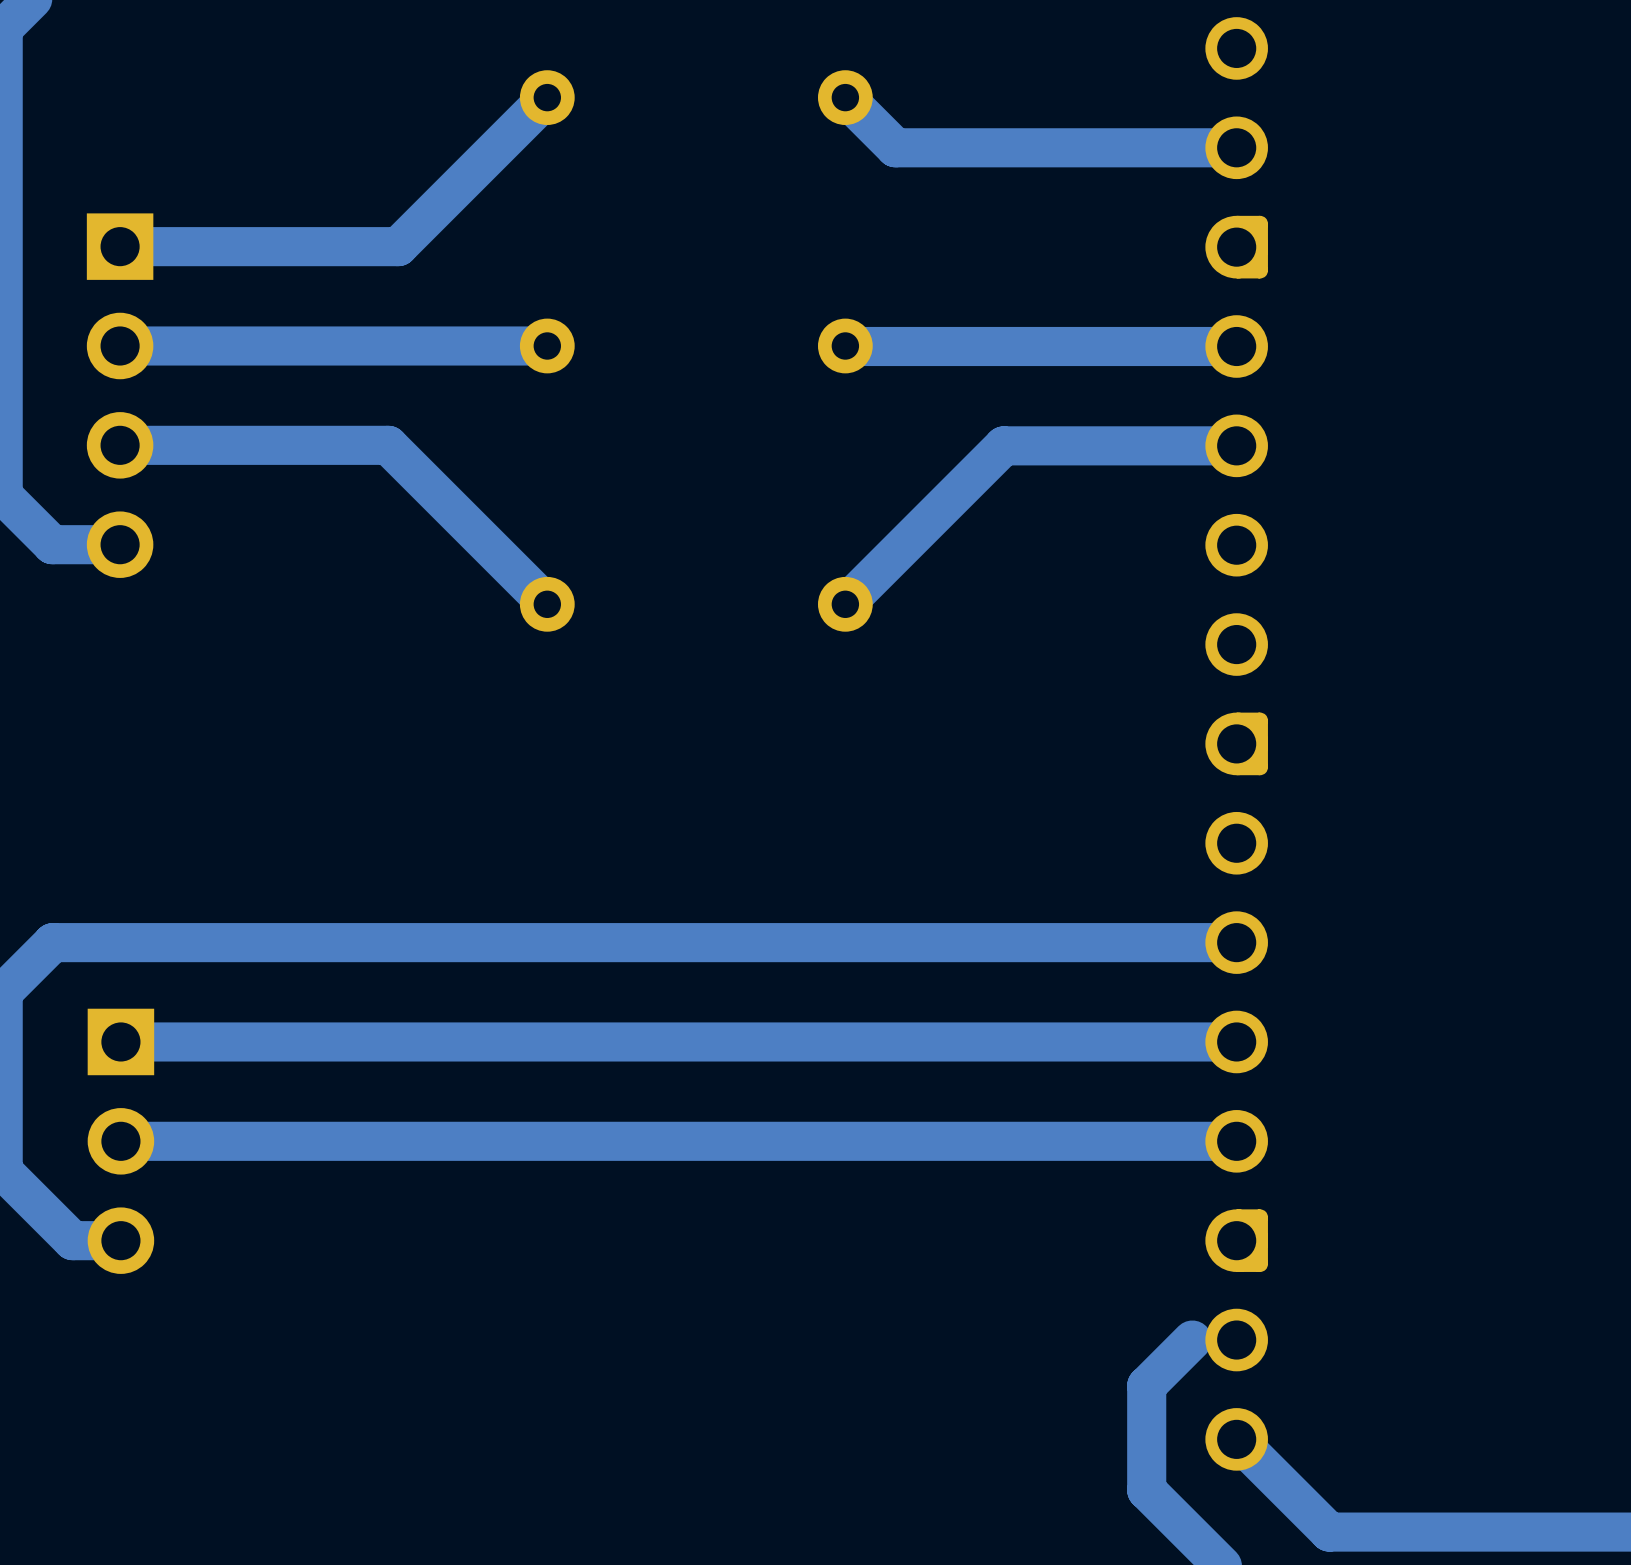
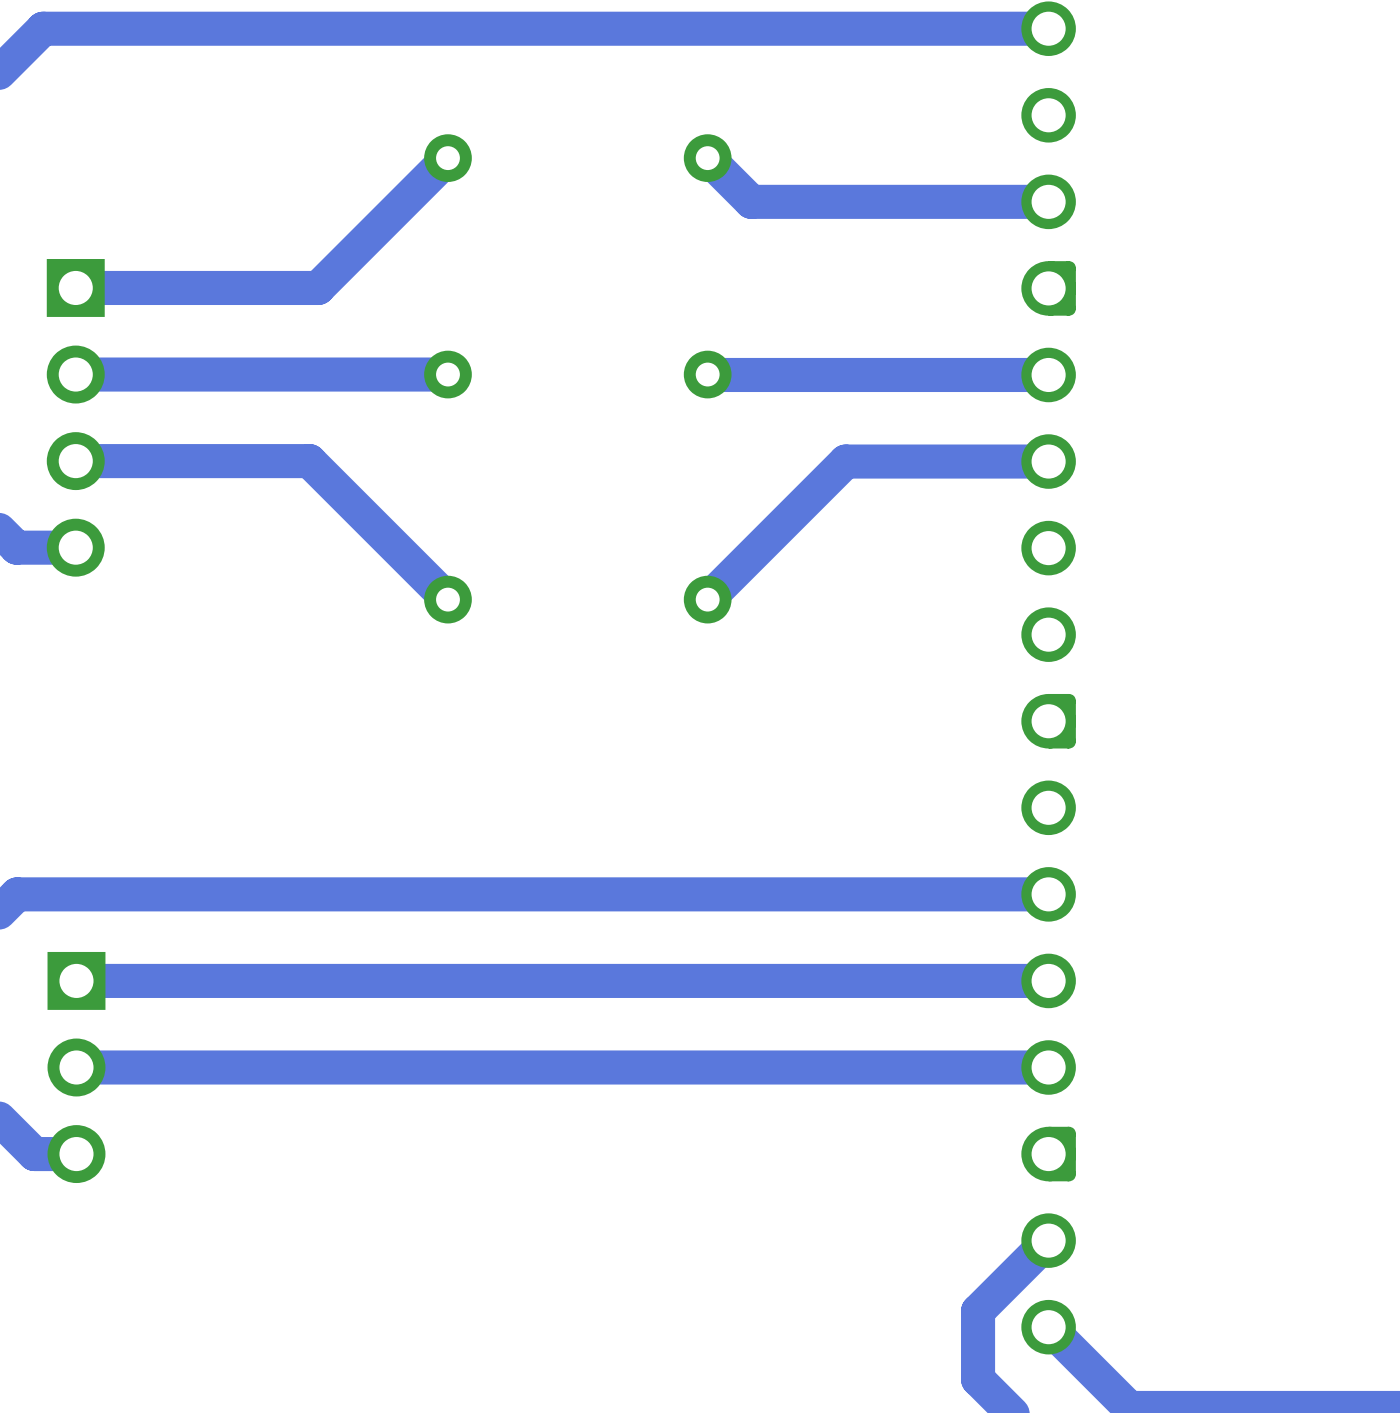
track: (1192, 1340) (1146, 1385) (1146, 1490) (1155, 1499) -> (1048, 1240) (978, 1311) (978, 1379)

